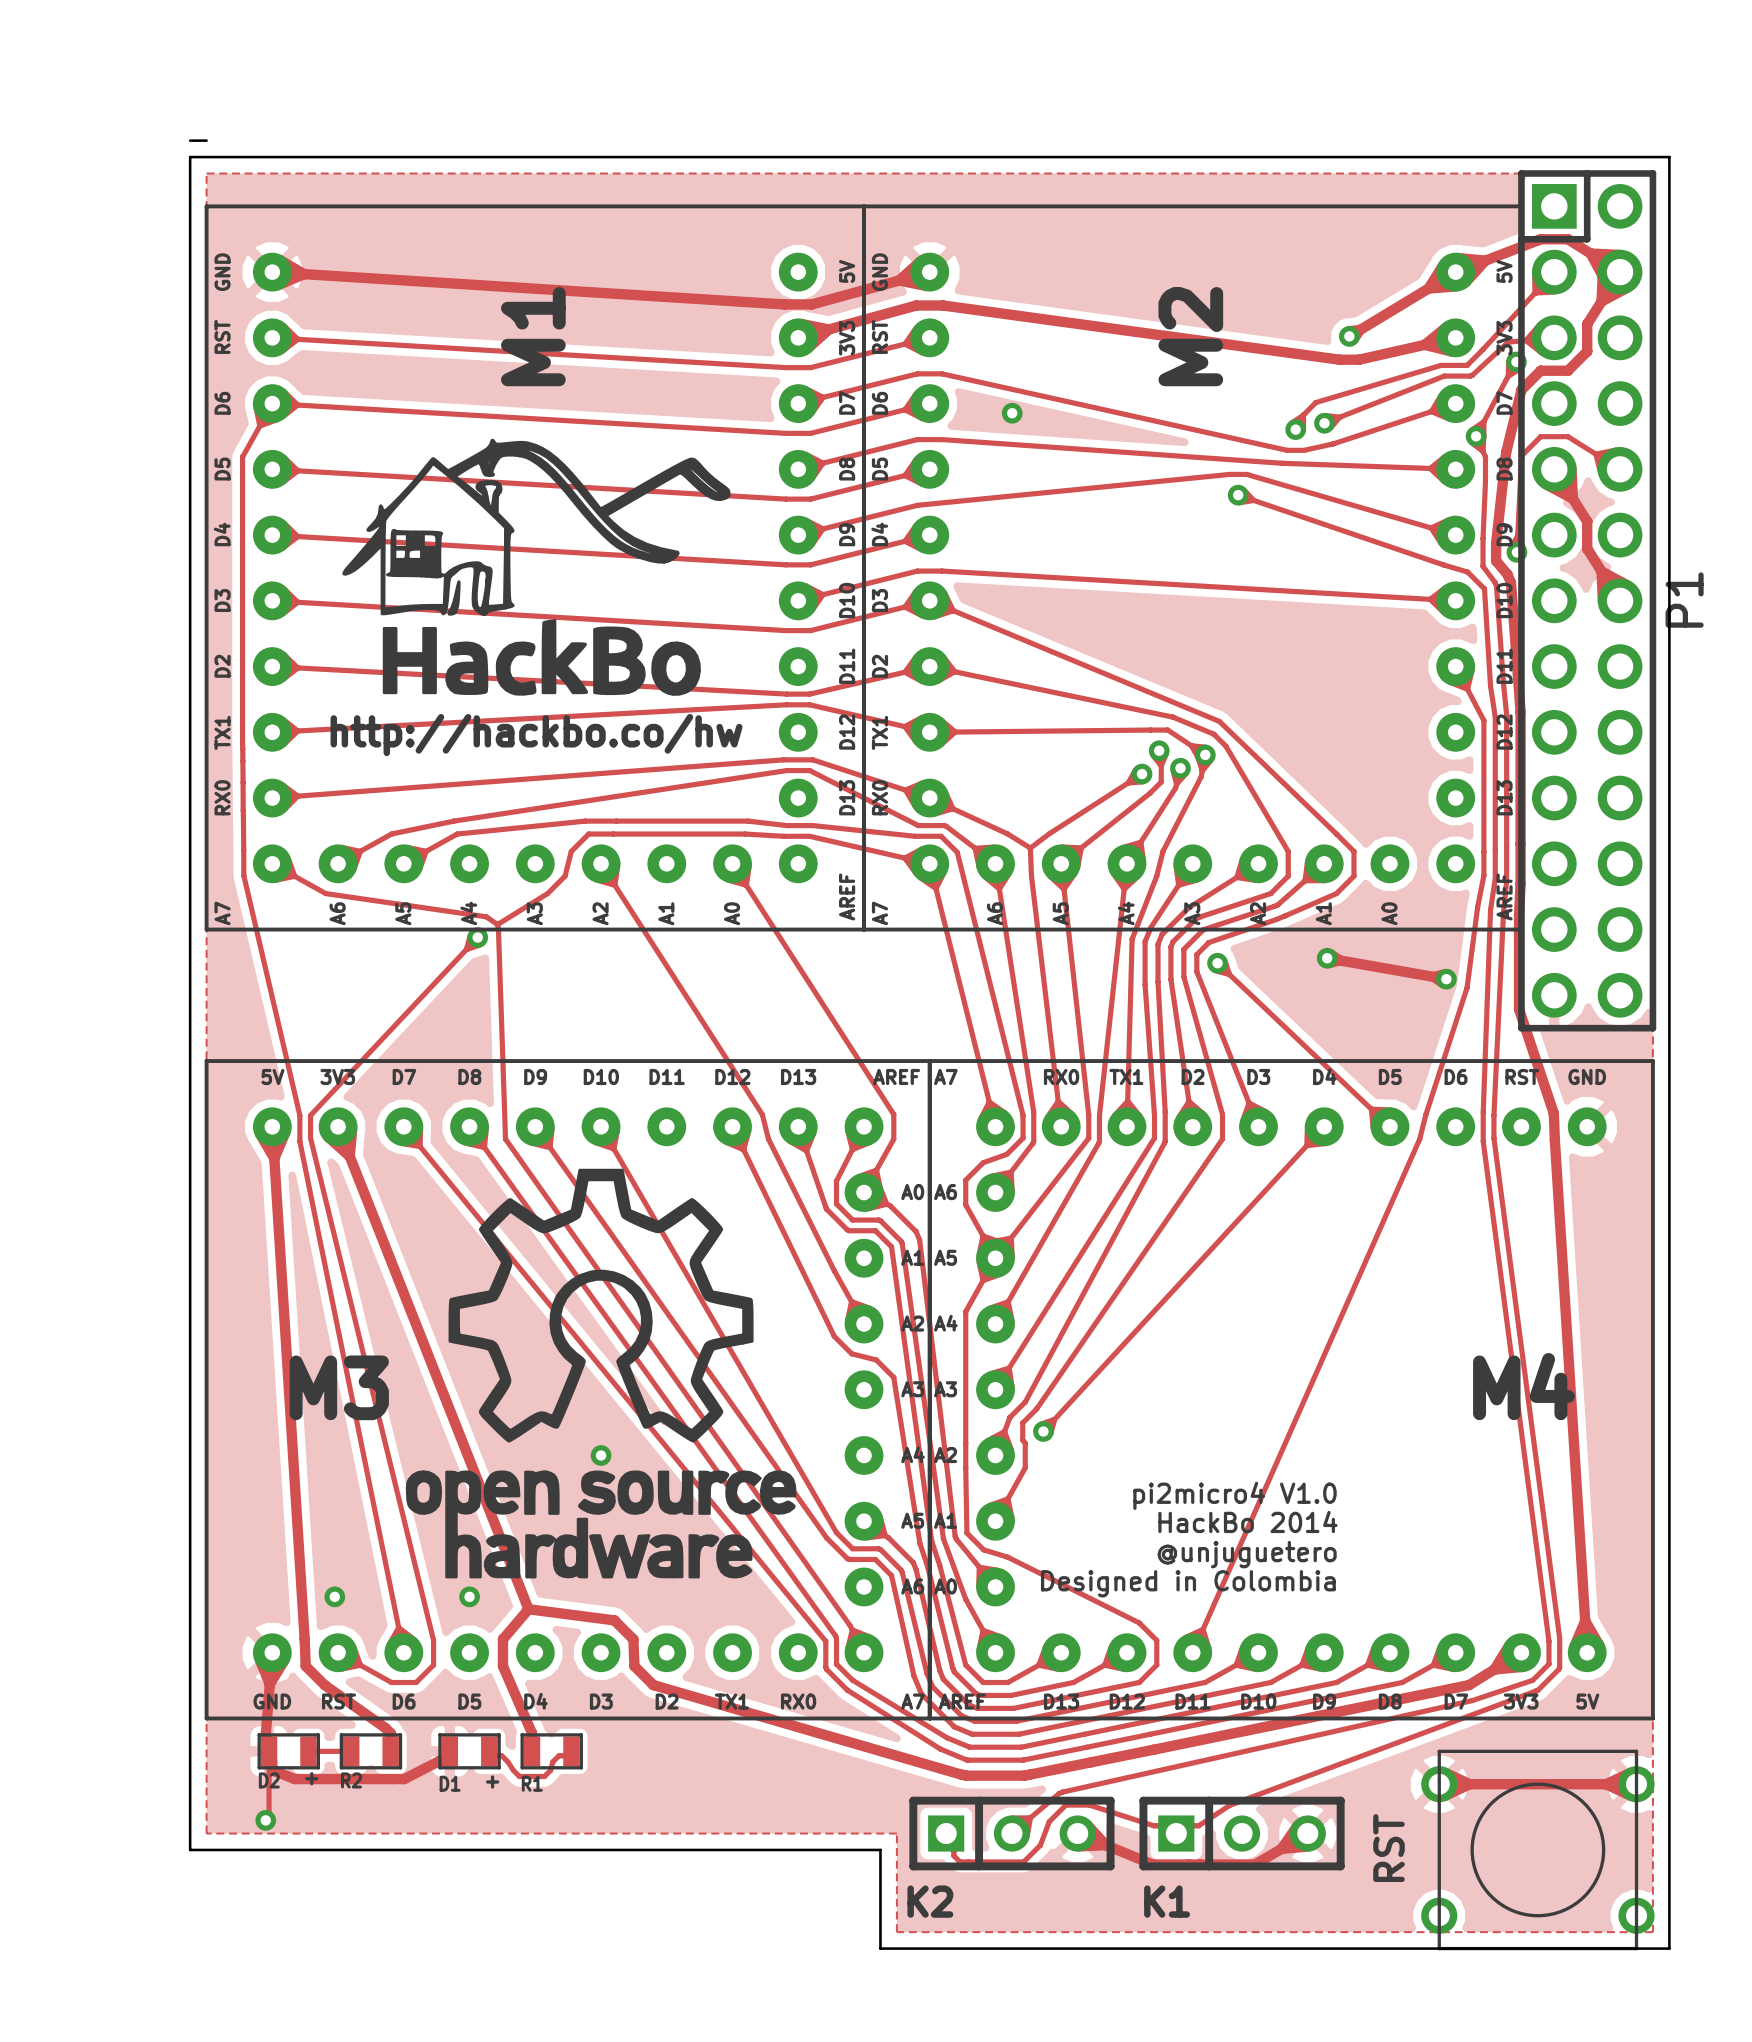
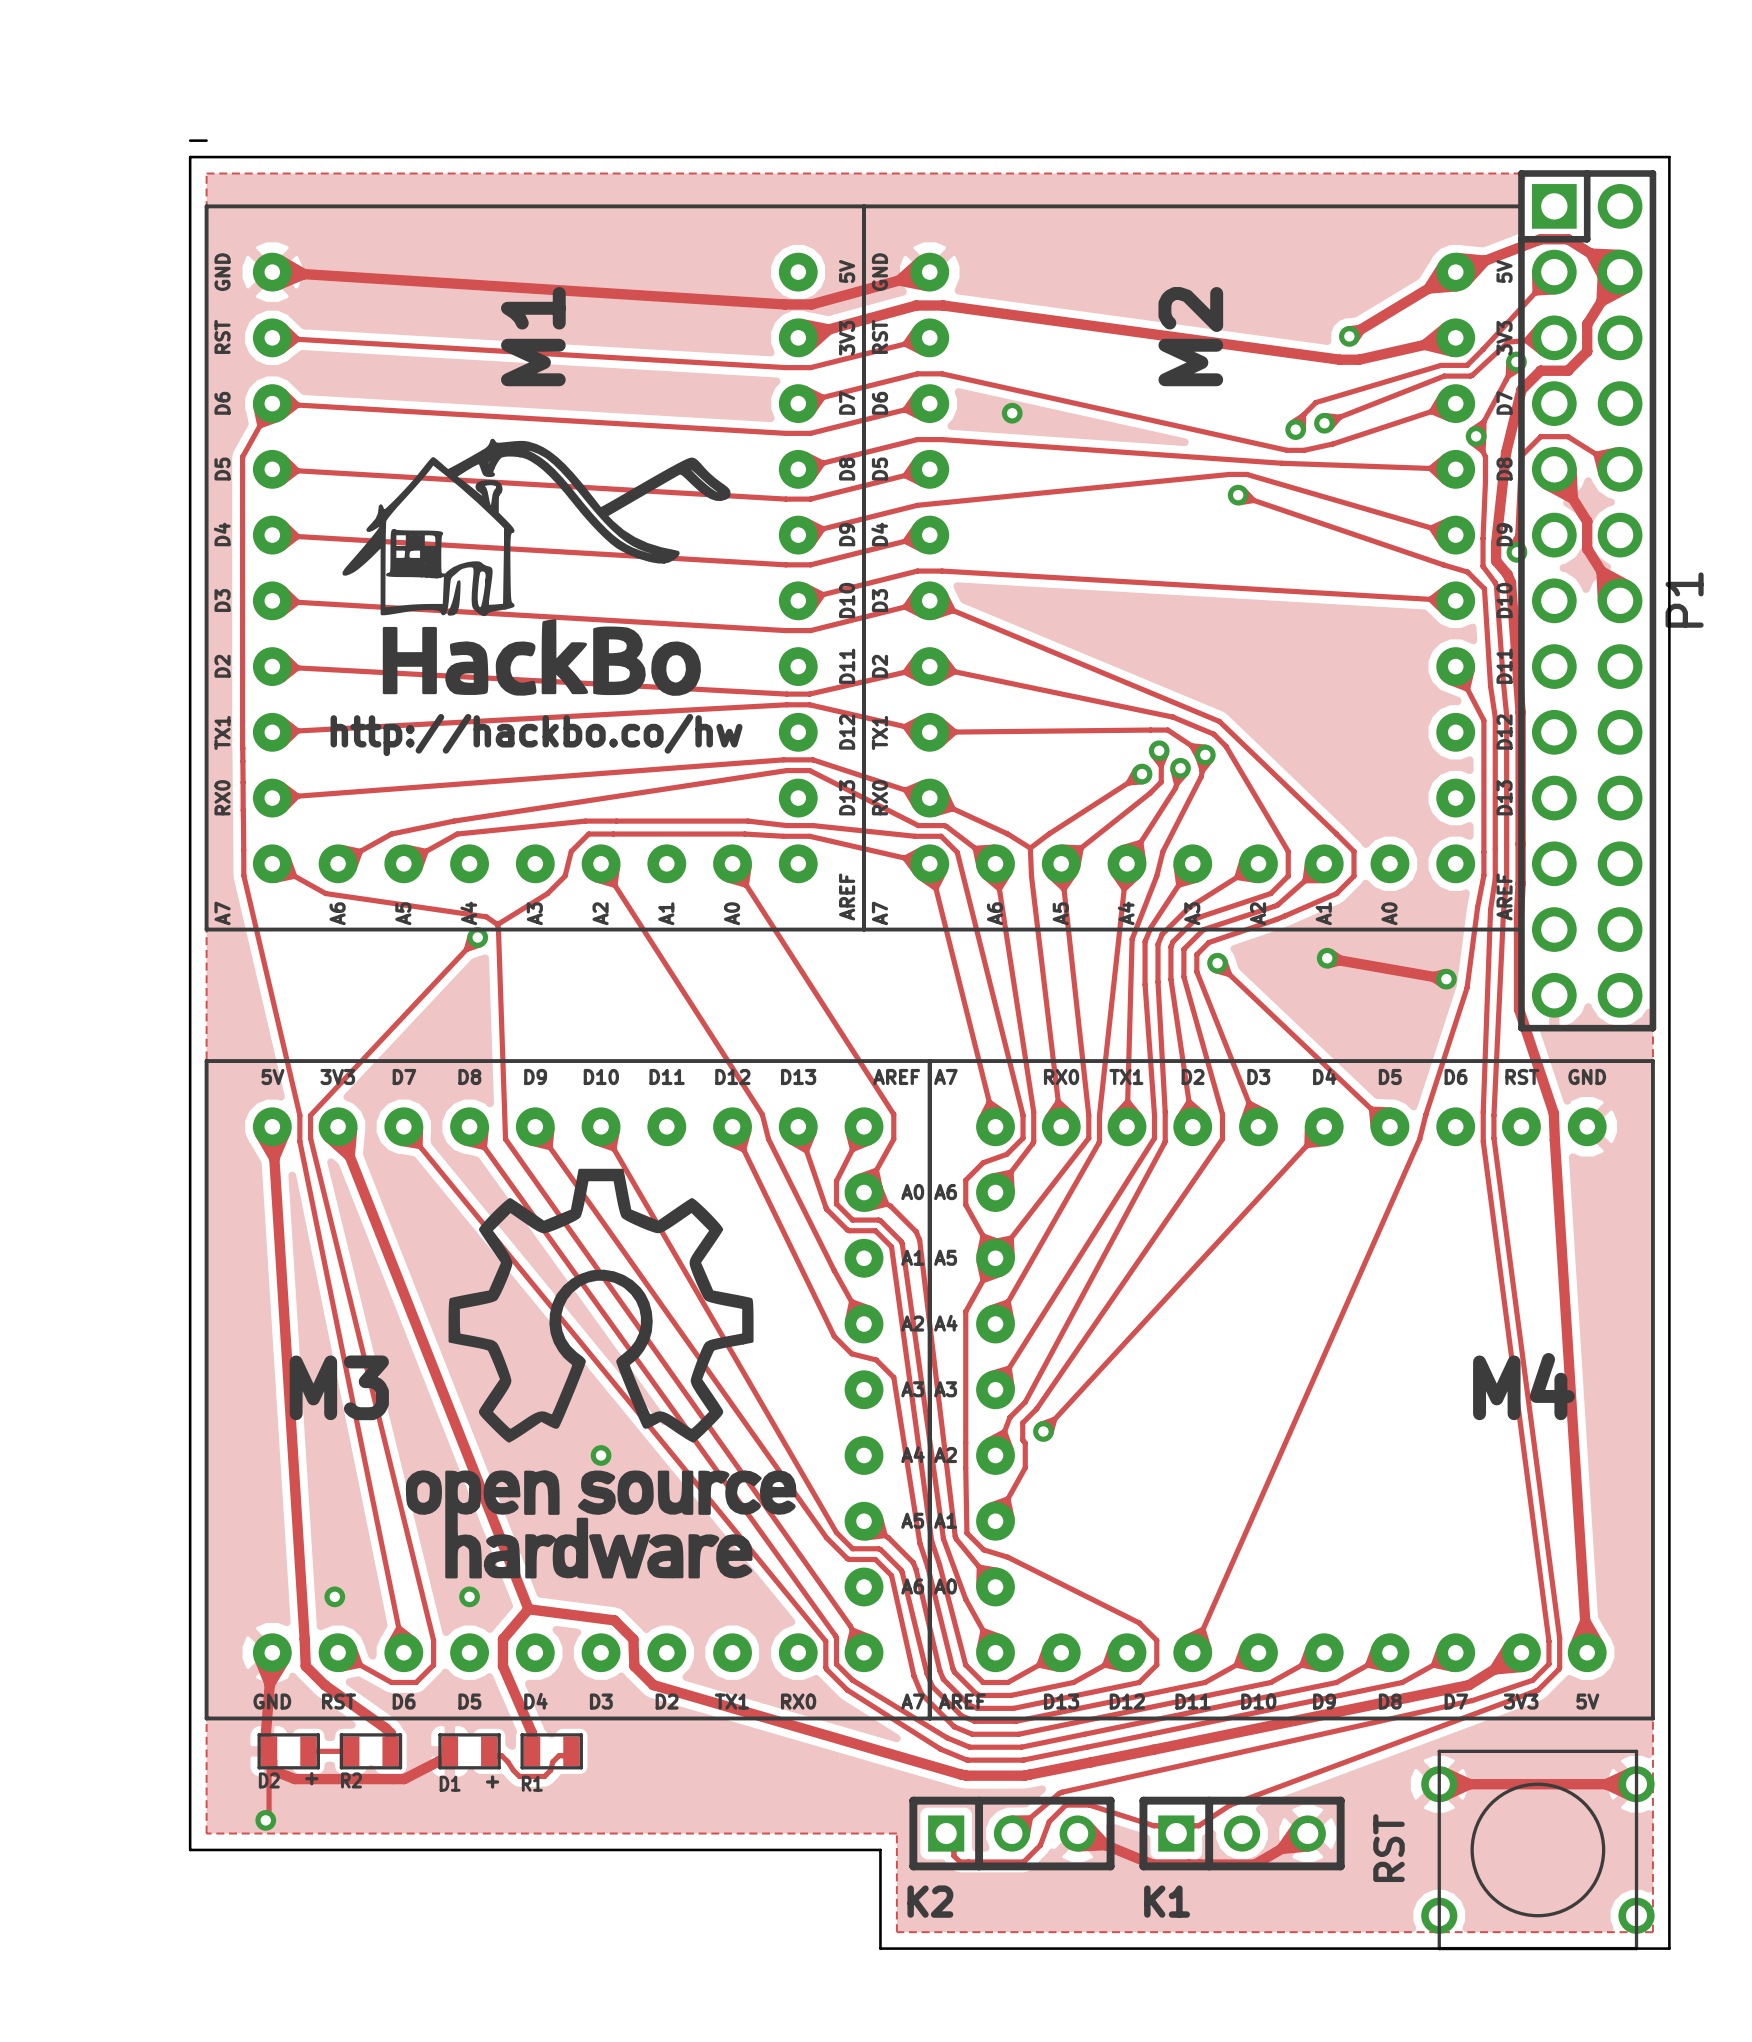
text: pi2micro4 V1.0 (1235, 1495) -> none
text: HackBo 2014 (1247, 1521) -> none
text: @unjuguetero (1247, 1554) -> none
text: Designed in Colombia (1188, 1583) -> none

